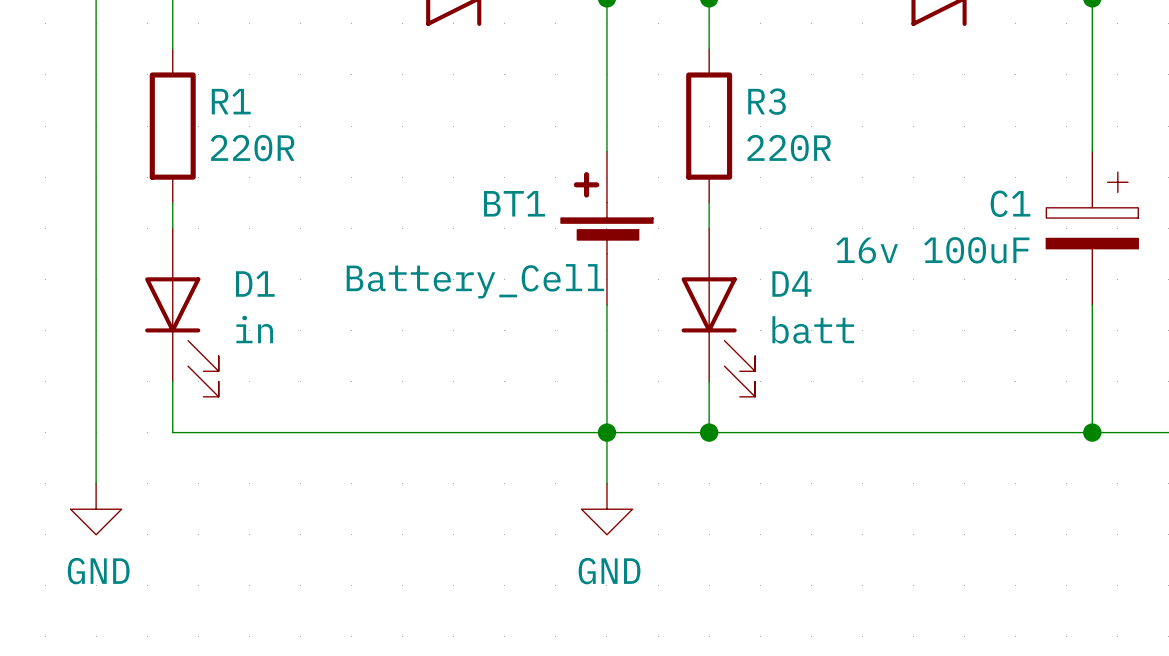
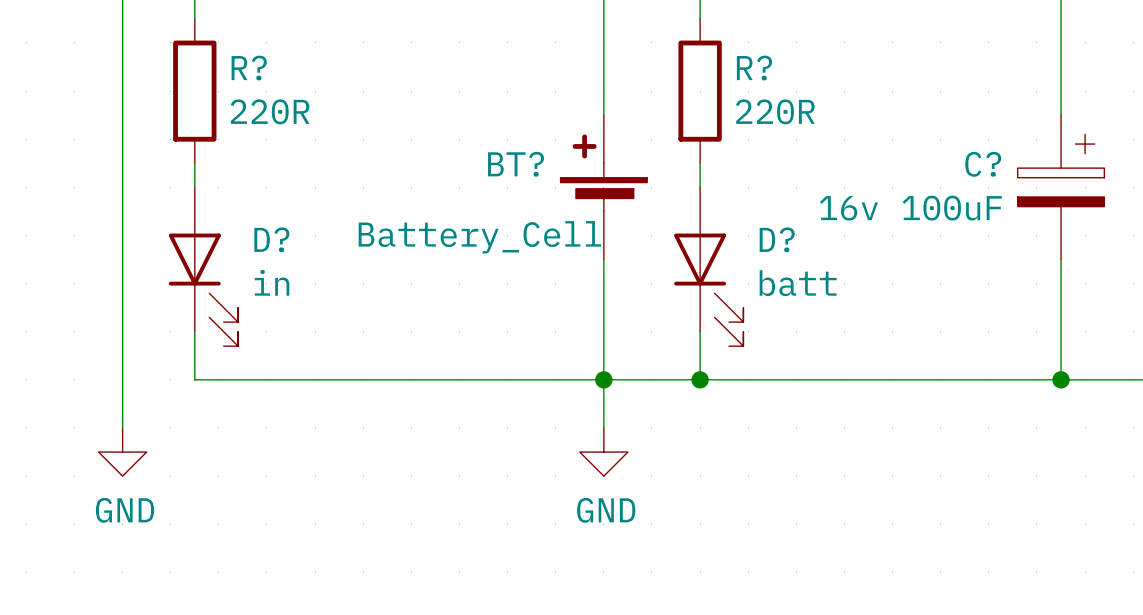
R1 name: R1 (231, 101) -> R? (249, 68)
R3 name: R3 (767, 101) -> R? (754, 68)
BT1 name: BT1 (514, 203) -> BT? (516, 164)
C1 name: C1 (1010, 203) -> C? (983, 164)
D1 name: D1 (255, 284) -> D? (271, 239)
D4 name: D4 (791, 284) -> D? (777, 239)

